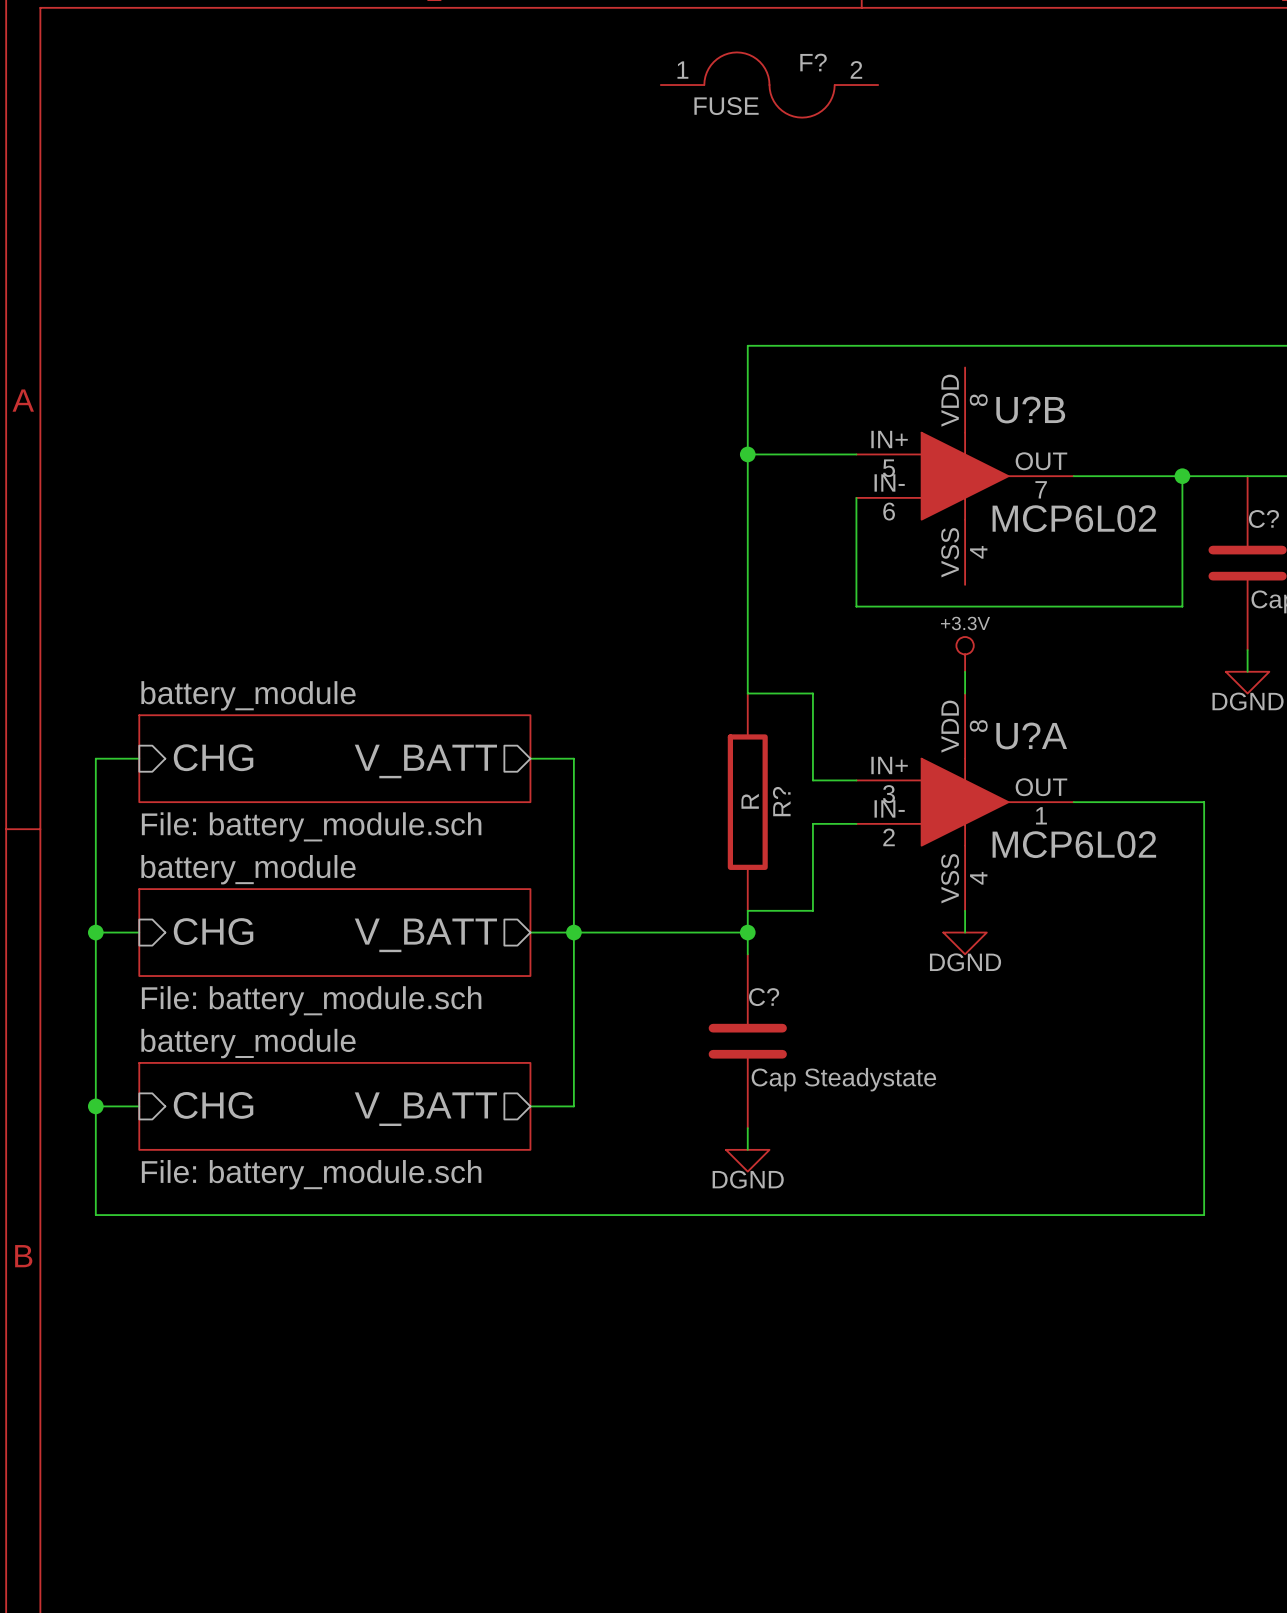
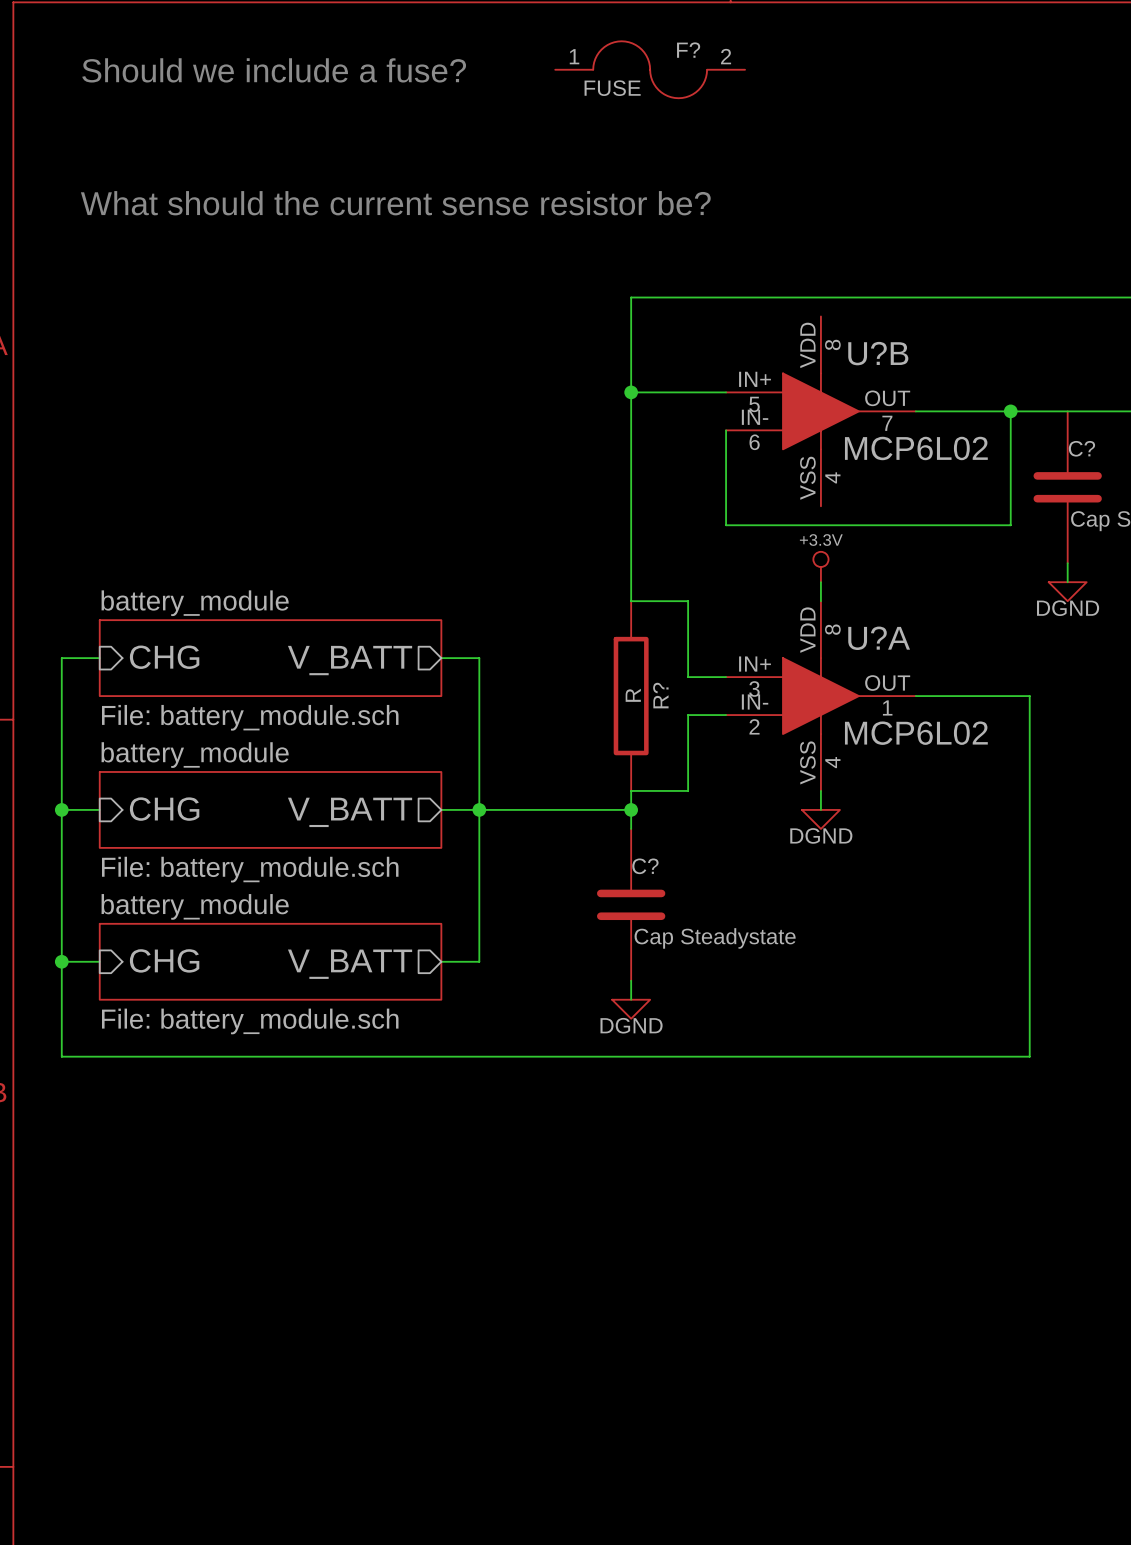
text: none -> Should we include a fuse? (274, 70)
text: none -> What should the current sense resistor be? (395, 203)

